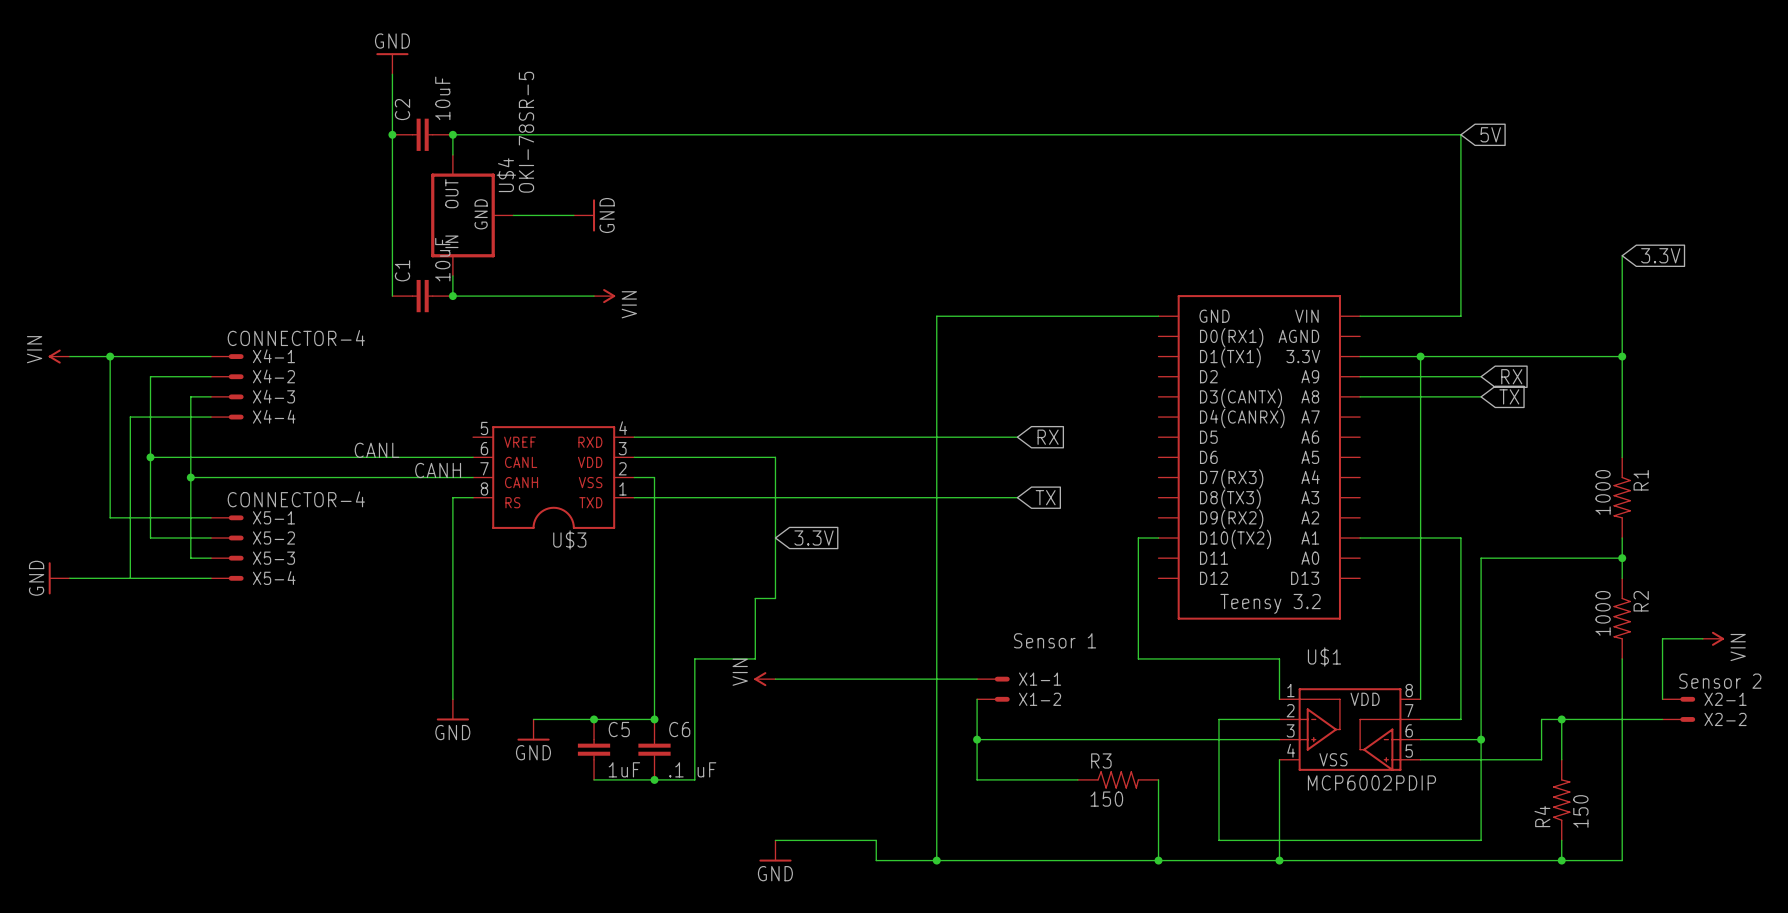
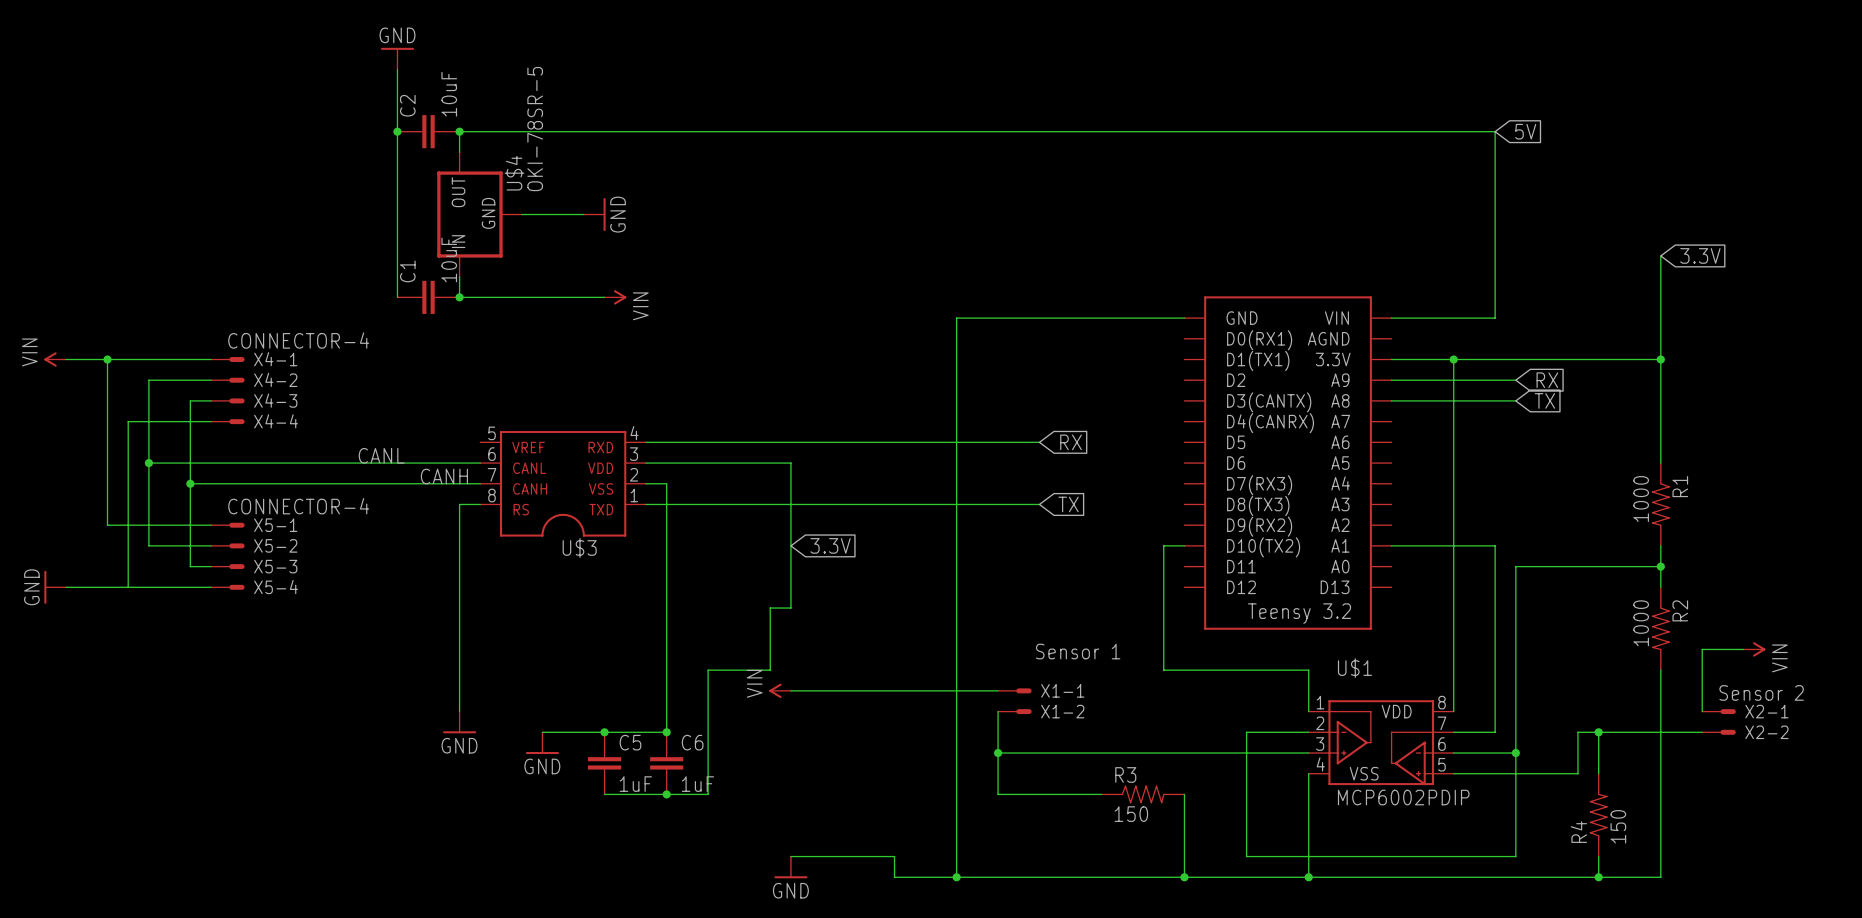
C6 value: .1 uF (692, 769) -> 1uF (697, 784)

